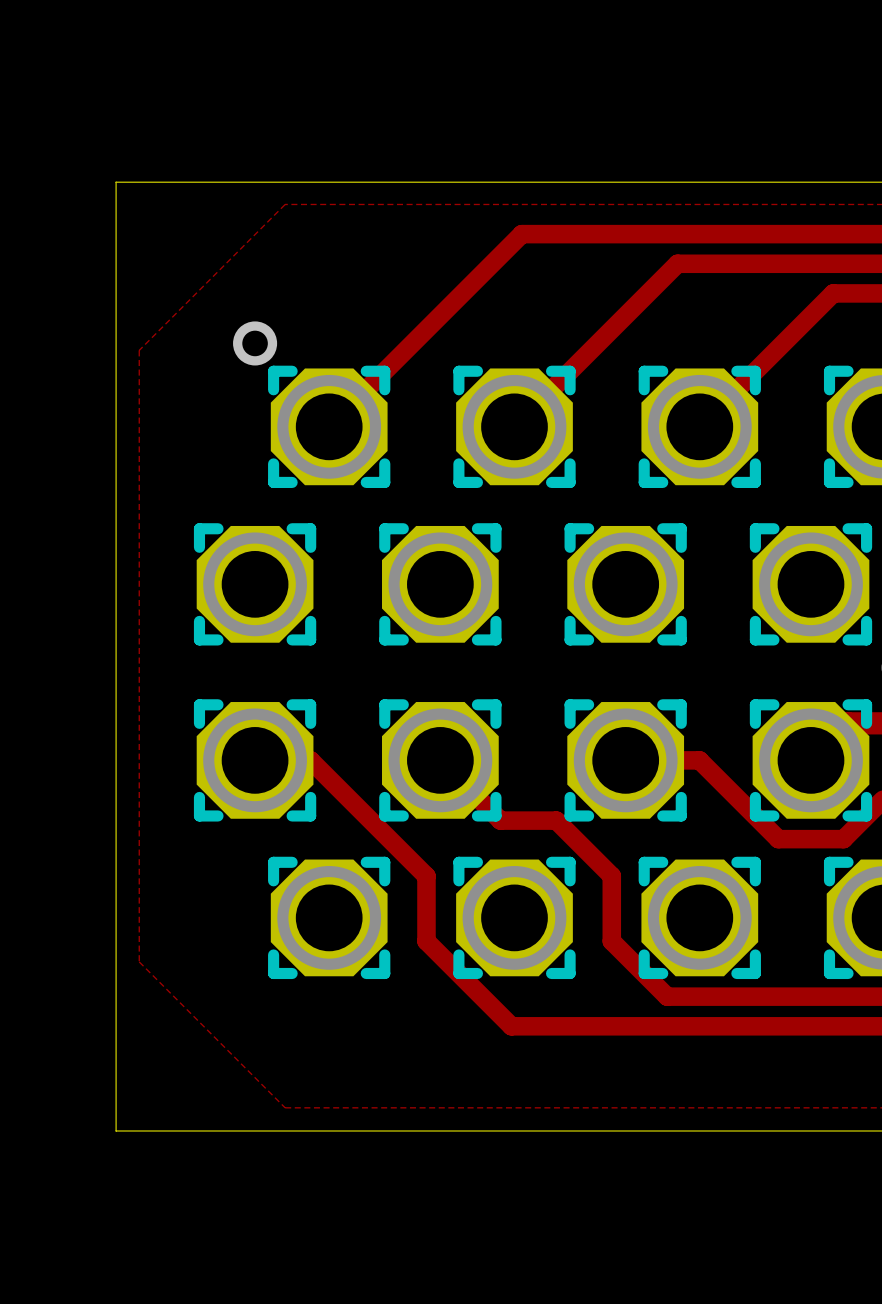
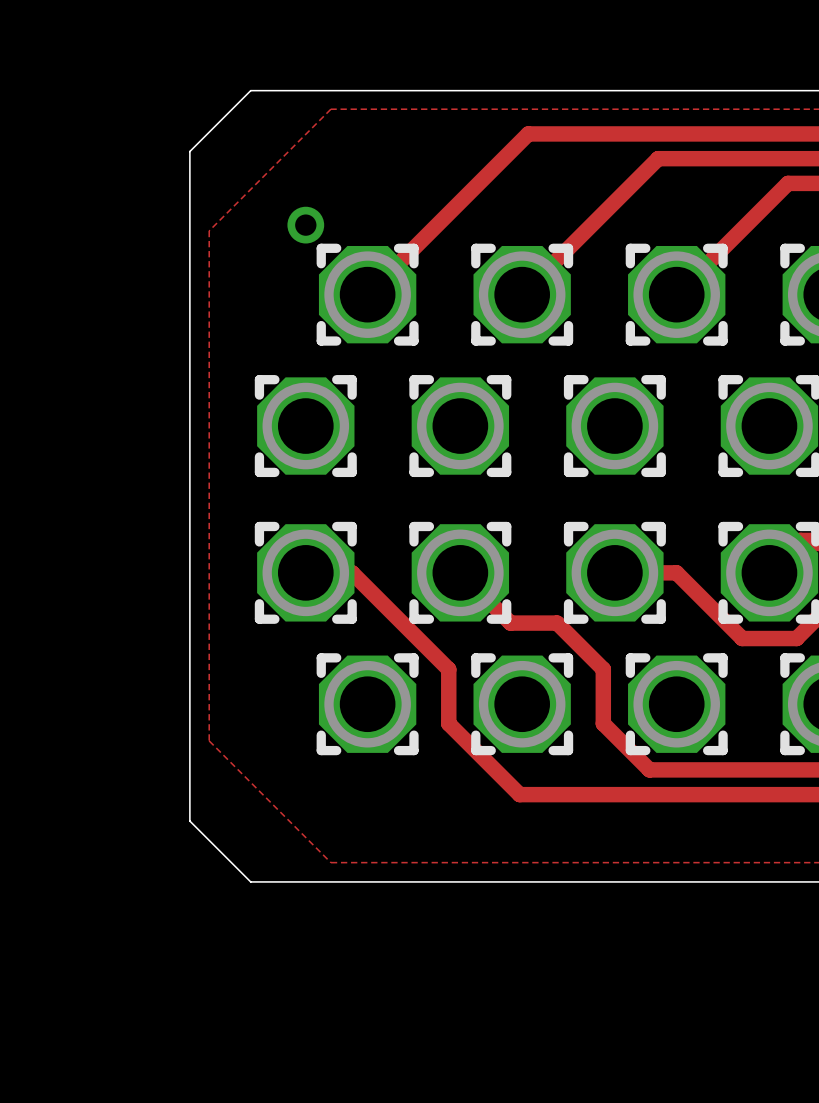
board edge: (189, 182) (116, 182) (116, 255) -> (250, 90) (189, 151)
board edge: (116, 1058) (116, 1131) (189, 1131) -> (189, 821) (250, 881)

